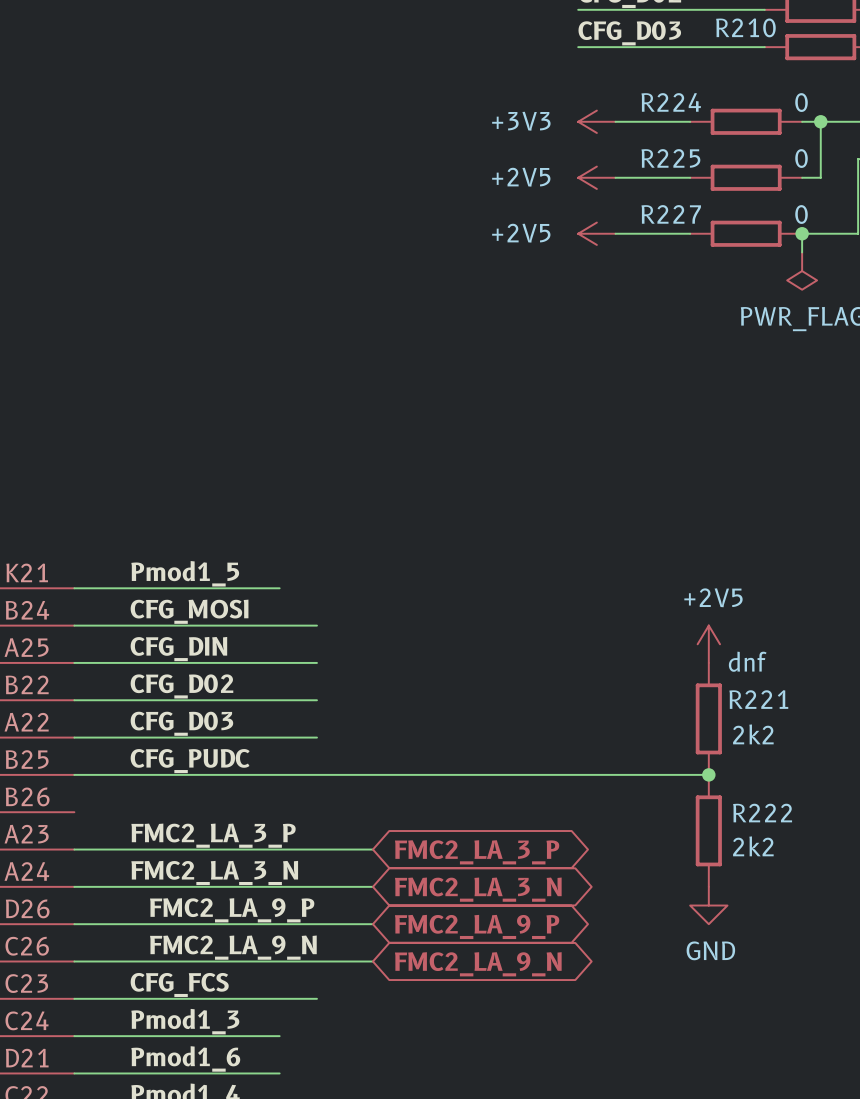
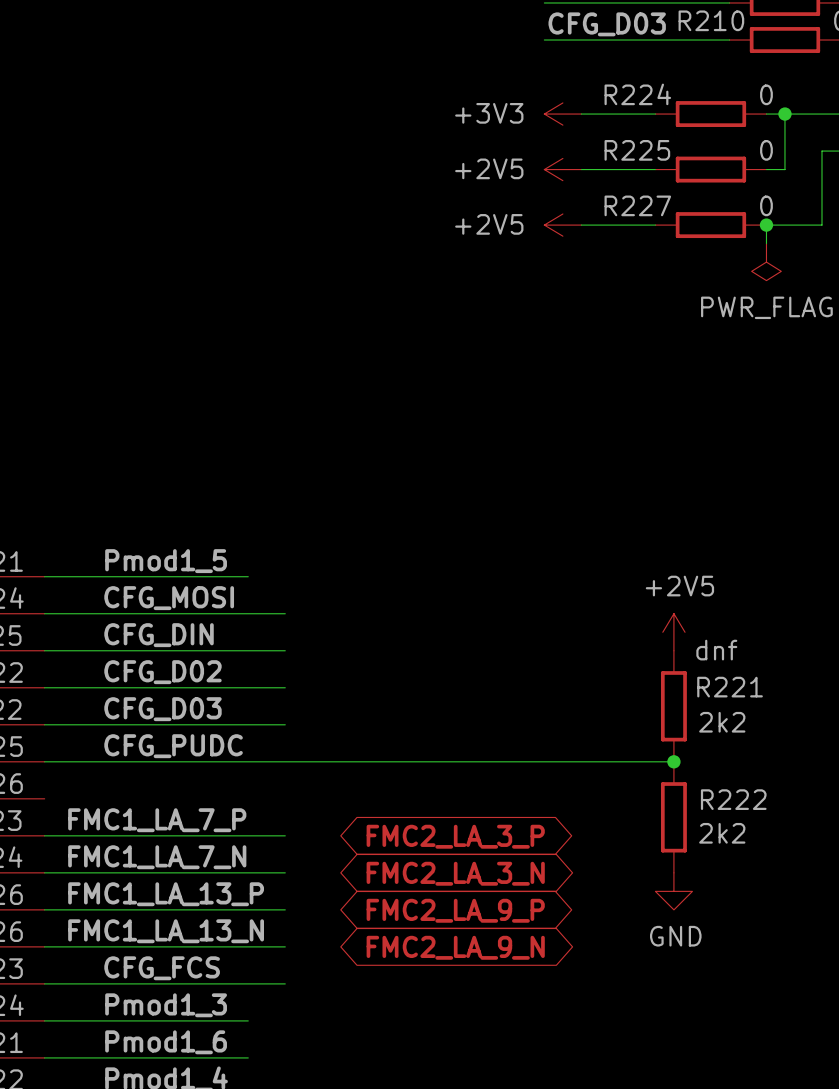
label: none -> FMC1_LA_7_P (157, 820)
label: FMC2_LA_3_P (213, 835) -> none
wire: (316, 849) (372, 849) -> none
label: none -> FMC1_LA_7_N (157, 857)
label: FMC2_LA_3_N (214, 872) -> none
wire: (316, 886) (372, 886) -> none
label: none -> FMC1_LA_13_P (166, 894)
label: FMC2_LA_9_P (232, 910) -> none
wire: (316, 924) (372, 924) -> none
label: none -> FMC1_LA_13_N (166, 931)
label: FMC2_LA_9_N (233, 947) -> none
wire: (316, 961) (372, 961) -> none

